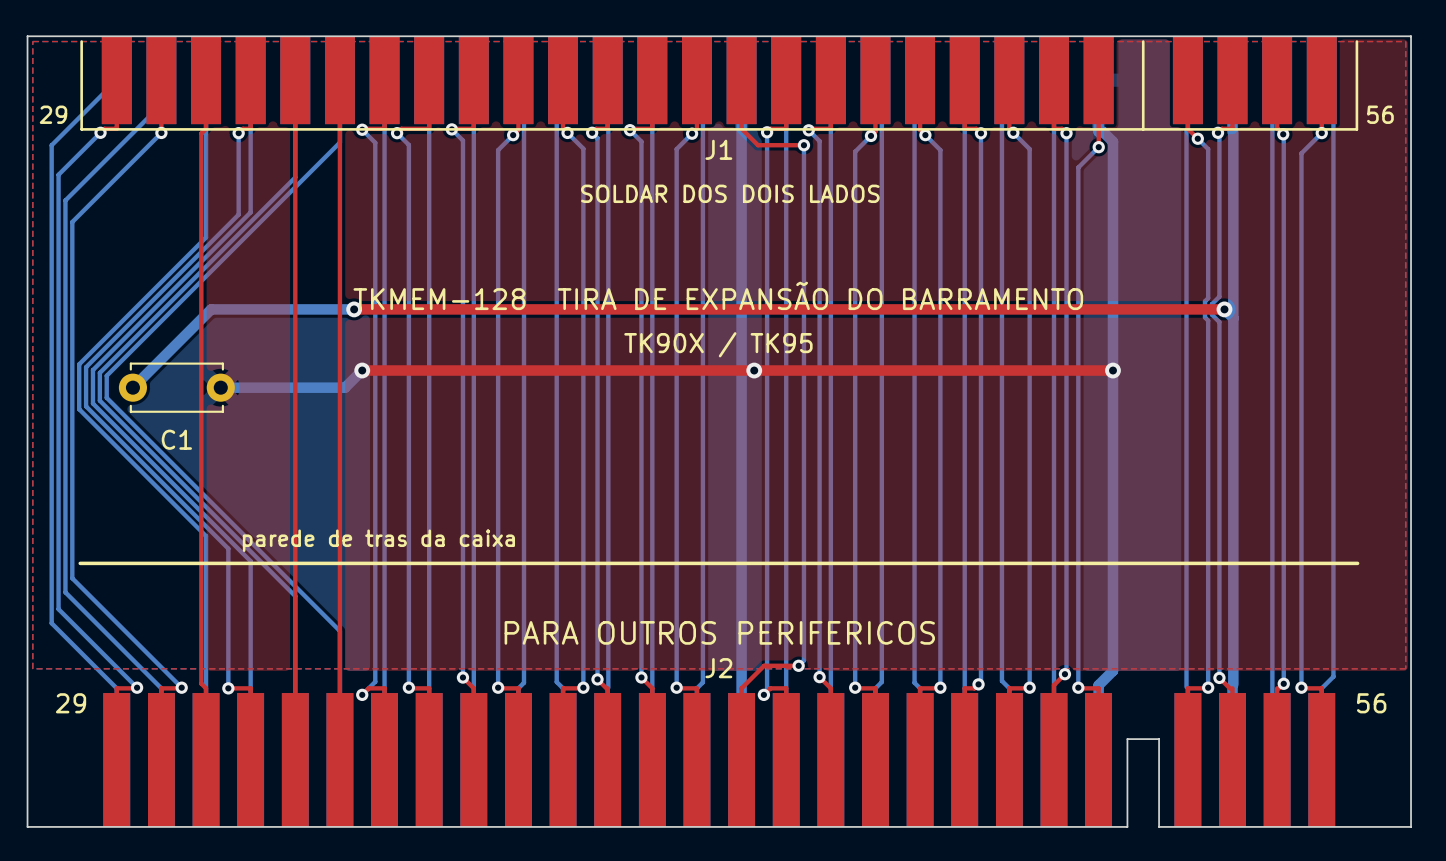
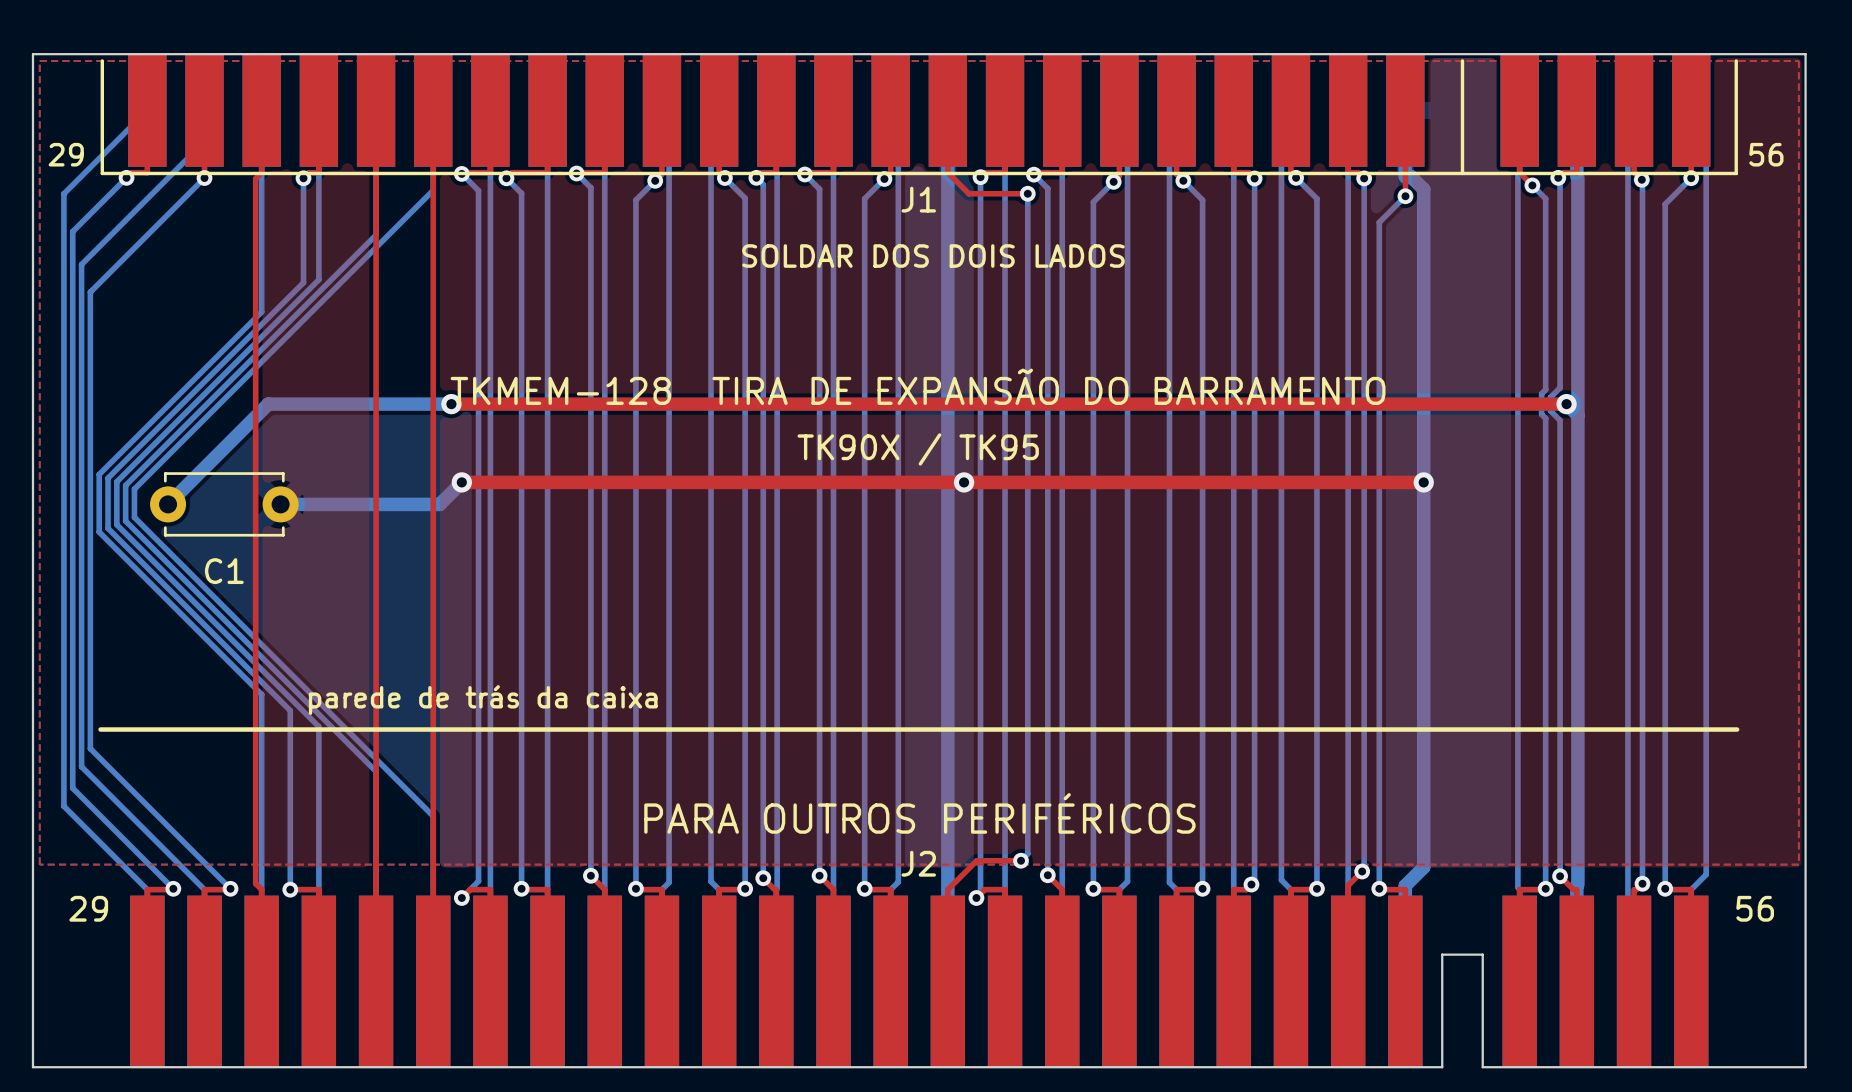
text: parede de tras da caixa (378, 540) -> parede de trás da caixa (483, 700)
text: PARA OUTROS PERIFERICOS (719, 632) -> PARA OUTROS PERIFÉRICOS (919, 813)

